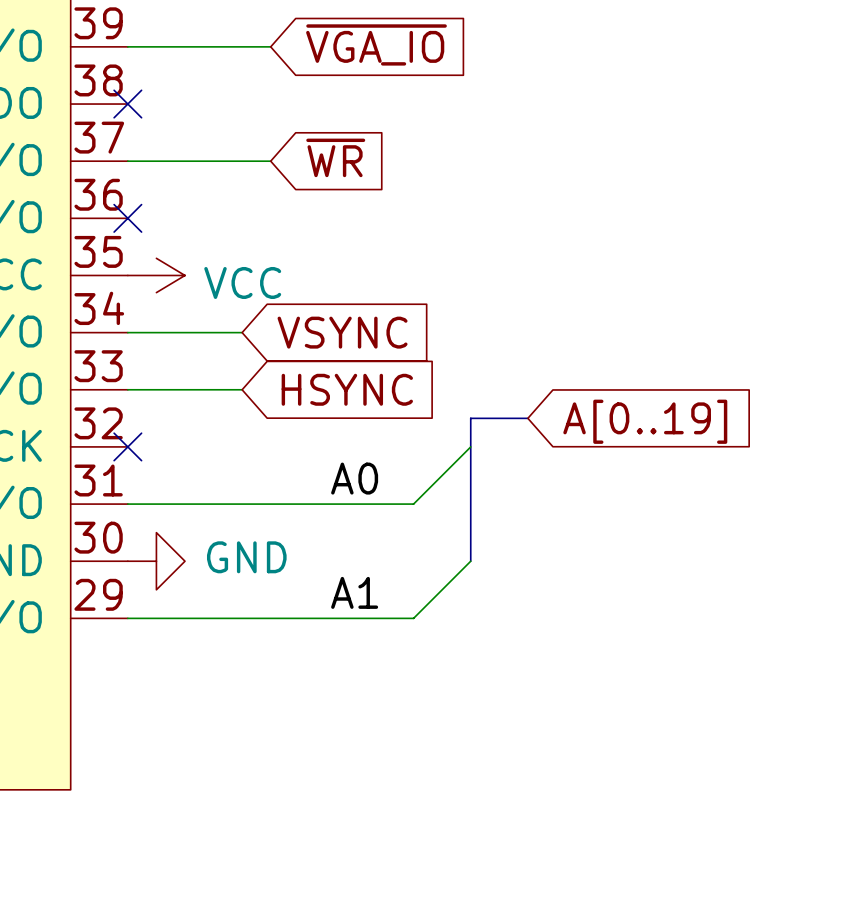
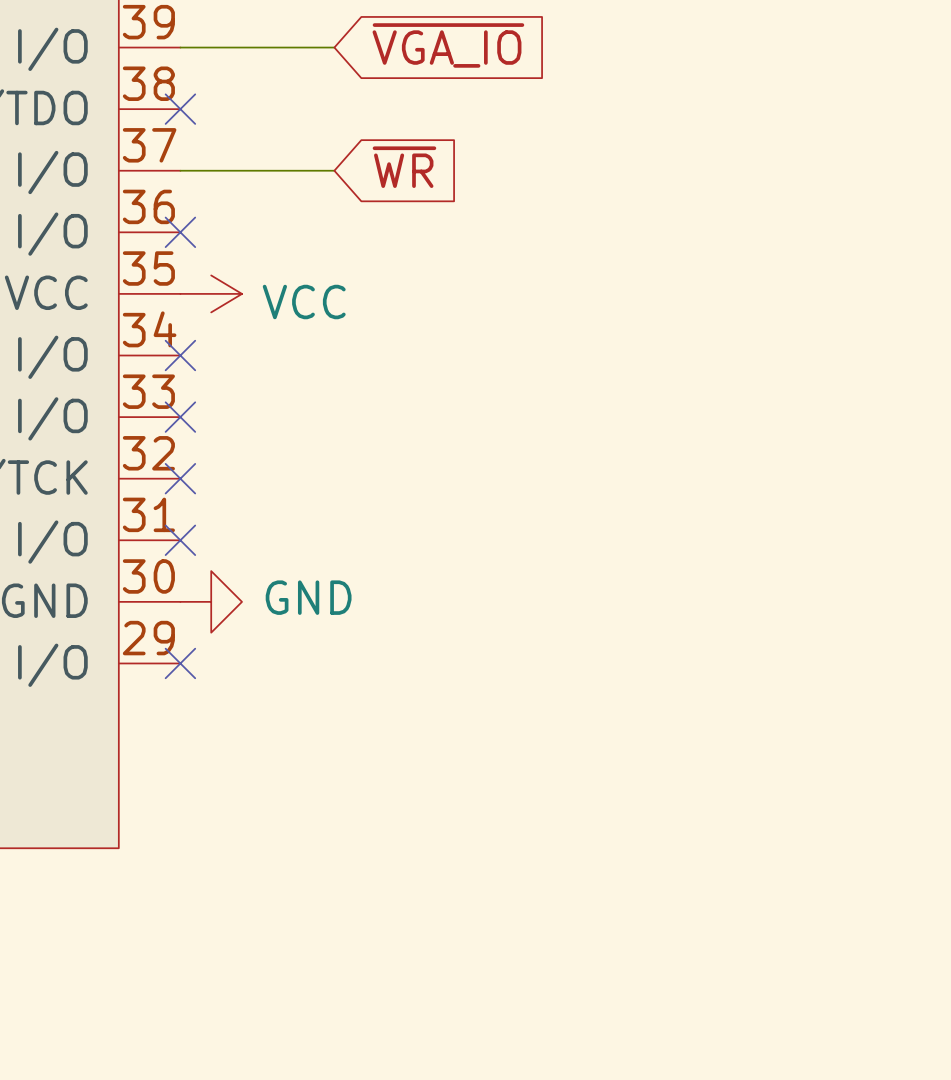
wire: (127, 332) (242, 332) -> none
no-connect mark: none -> (180, 355)
global label: VSYNC (342, 332) -> none
wire: (127, 389) (242, 389) -> none
no-connect mark: none -> (180, 417)
global label: HSYNC (347, 389) -> none
bus: (527, 418) (470, 418) (470, 561) -> none
global label: A[0..19] (645, 421) -> none
wire: (470, 446) (413, 504) (127, 504) -> none
label: A0 (354, 478) -> none
no-connect mark: none -> (180, 540)
wire: (470, 561) (413, 618) (127, 618) -> none
label: A1 (354, 592) -> none
no-connect mark: none -> (180, 663)

